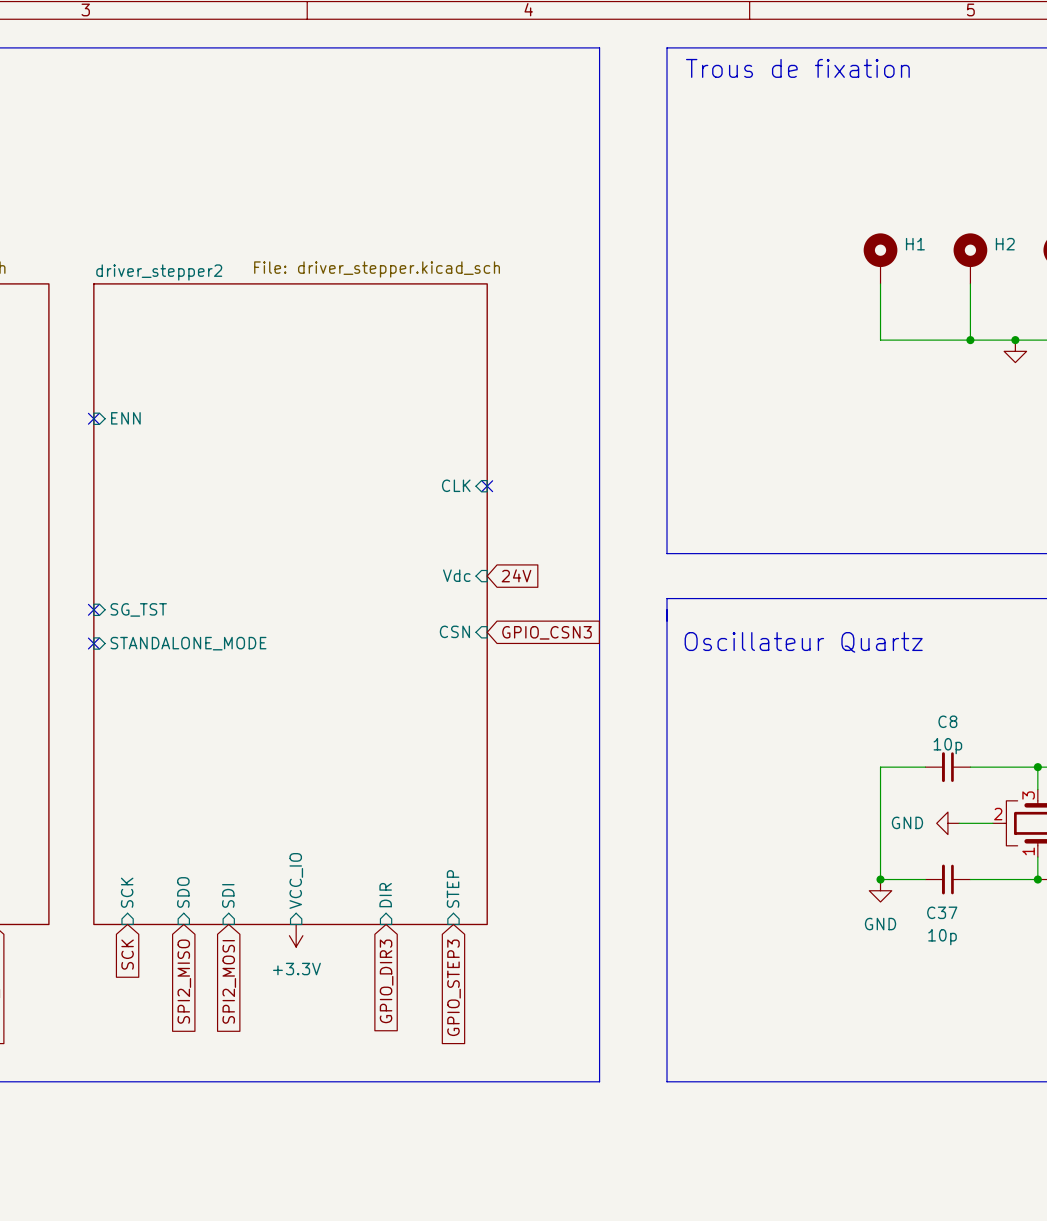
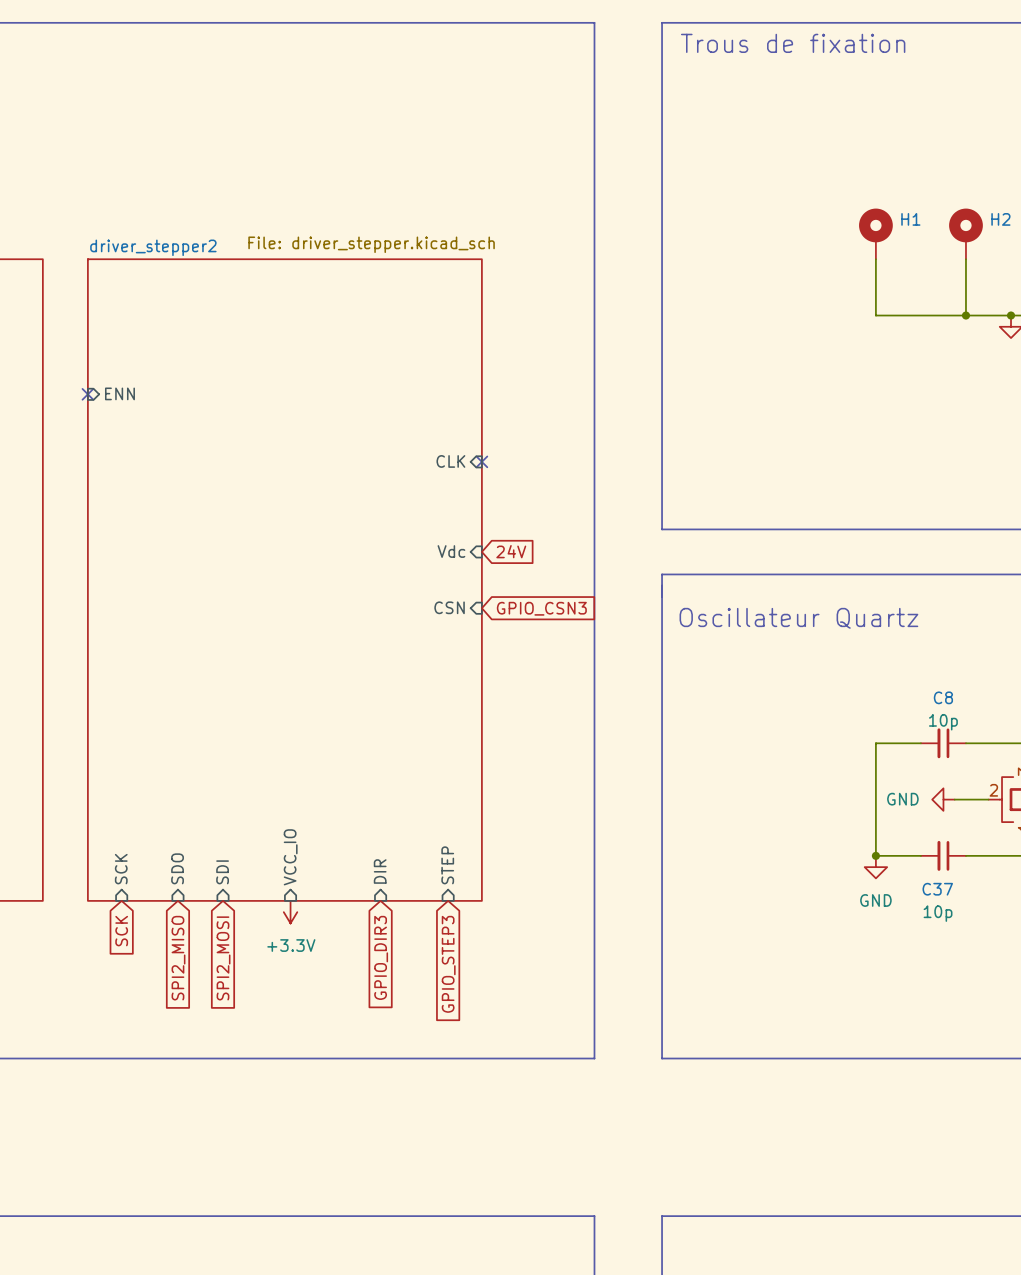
no-connect mark: (93, 609) -> none
sheet pin: SG_TST (138, 609) -> none
no-connect mark: (93, 643) -> none
sheet pin: STANDALONE_MODE (188, 643) -> none

